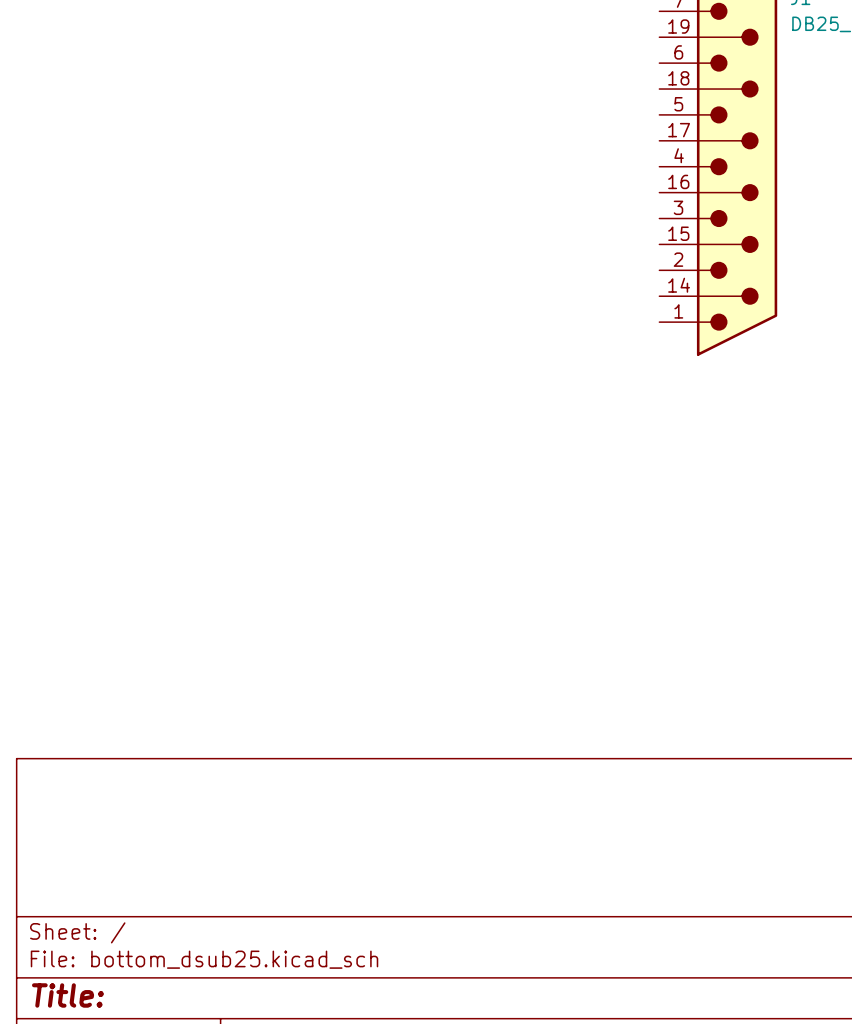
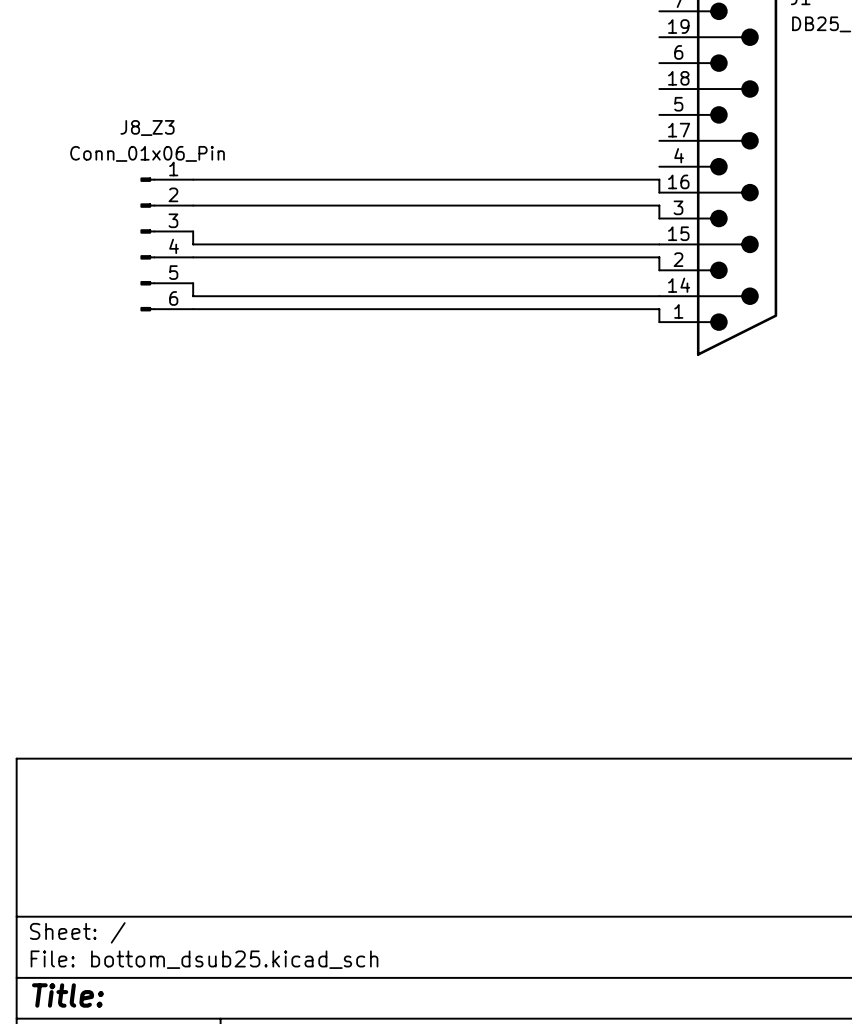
wire: none -> (193, 179) (659, 179) (659, 192)
wire: none -> (193, 205) (659, 205) (659, 218)
wire: none -> (193, 231) (193, 244) (659, 244)
J8_Z3: none -> Conn_01x06_Pin (166, 244)
wire: none -> (193, 257) (659, 257) (659, 270)
wire: none -> (193, 283) (193, 296) (659, 296)
wire: none -> (193, 309) (659, 309) (659, 322)

